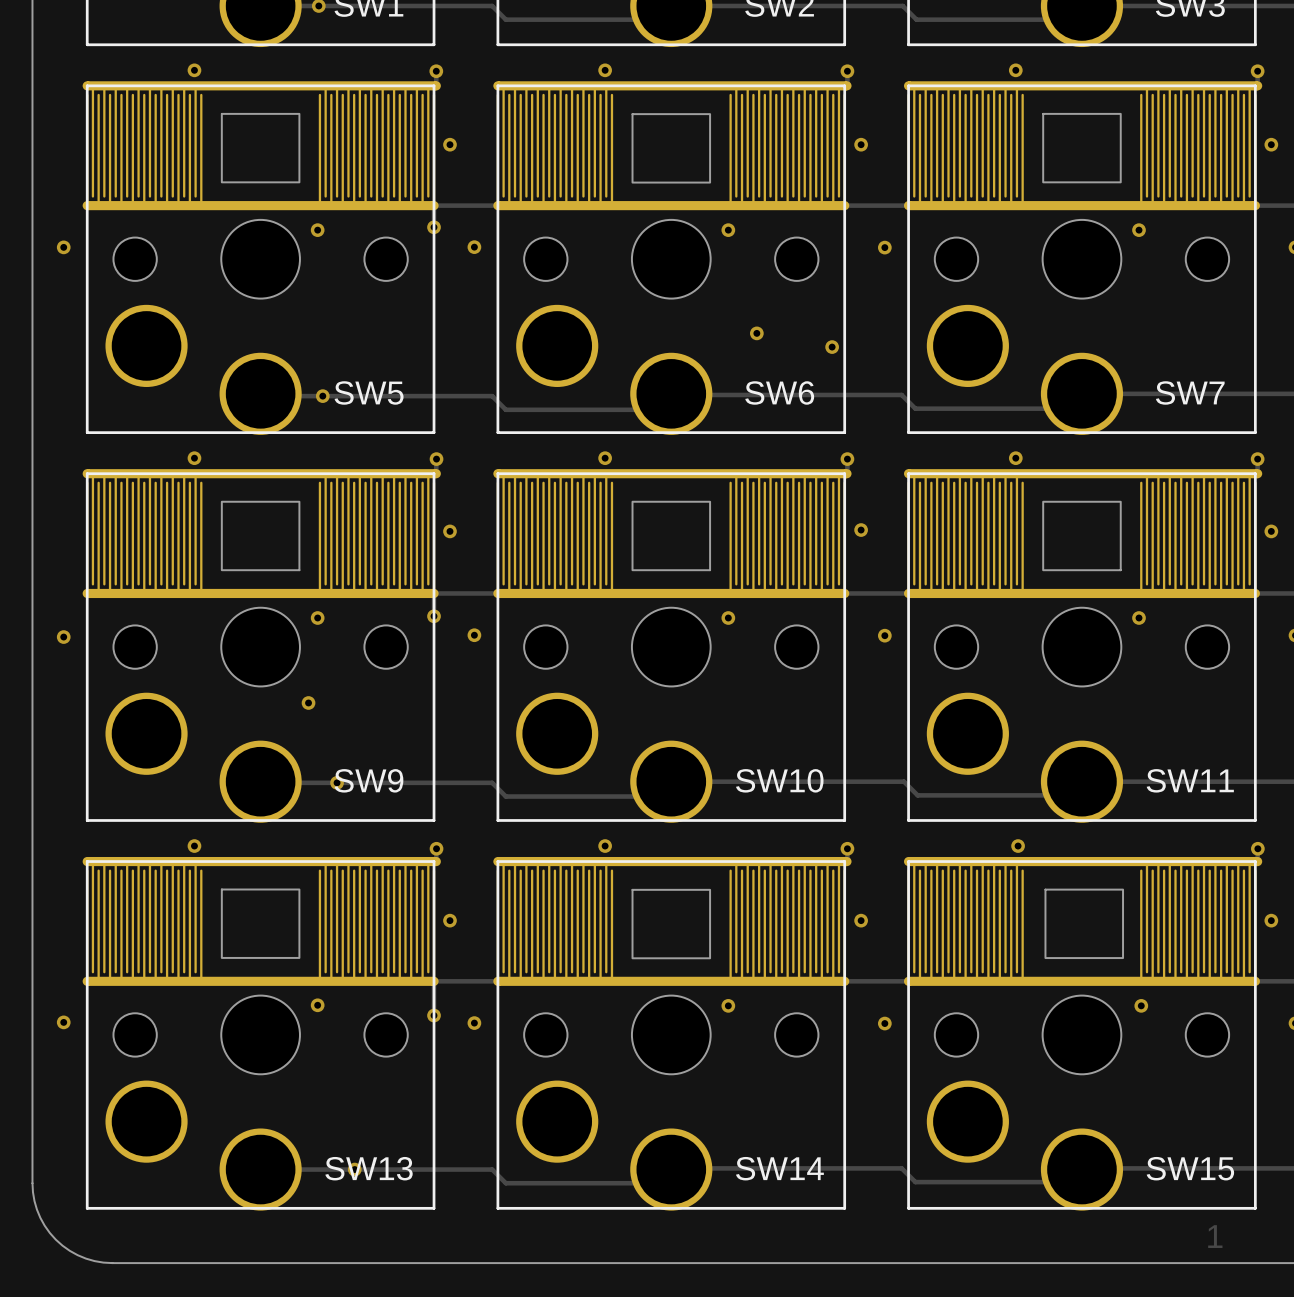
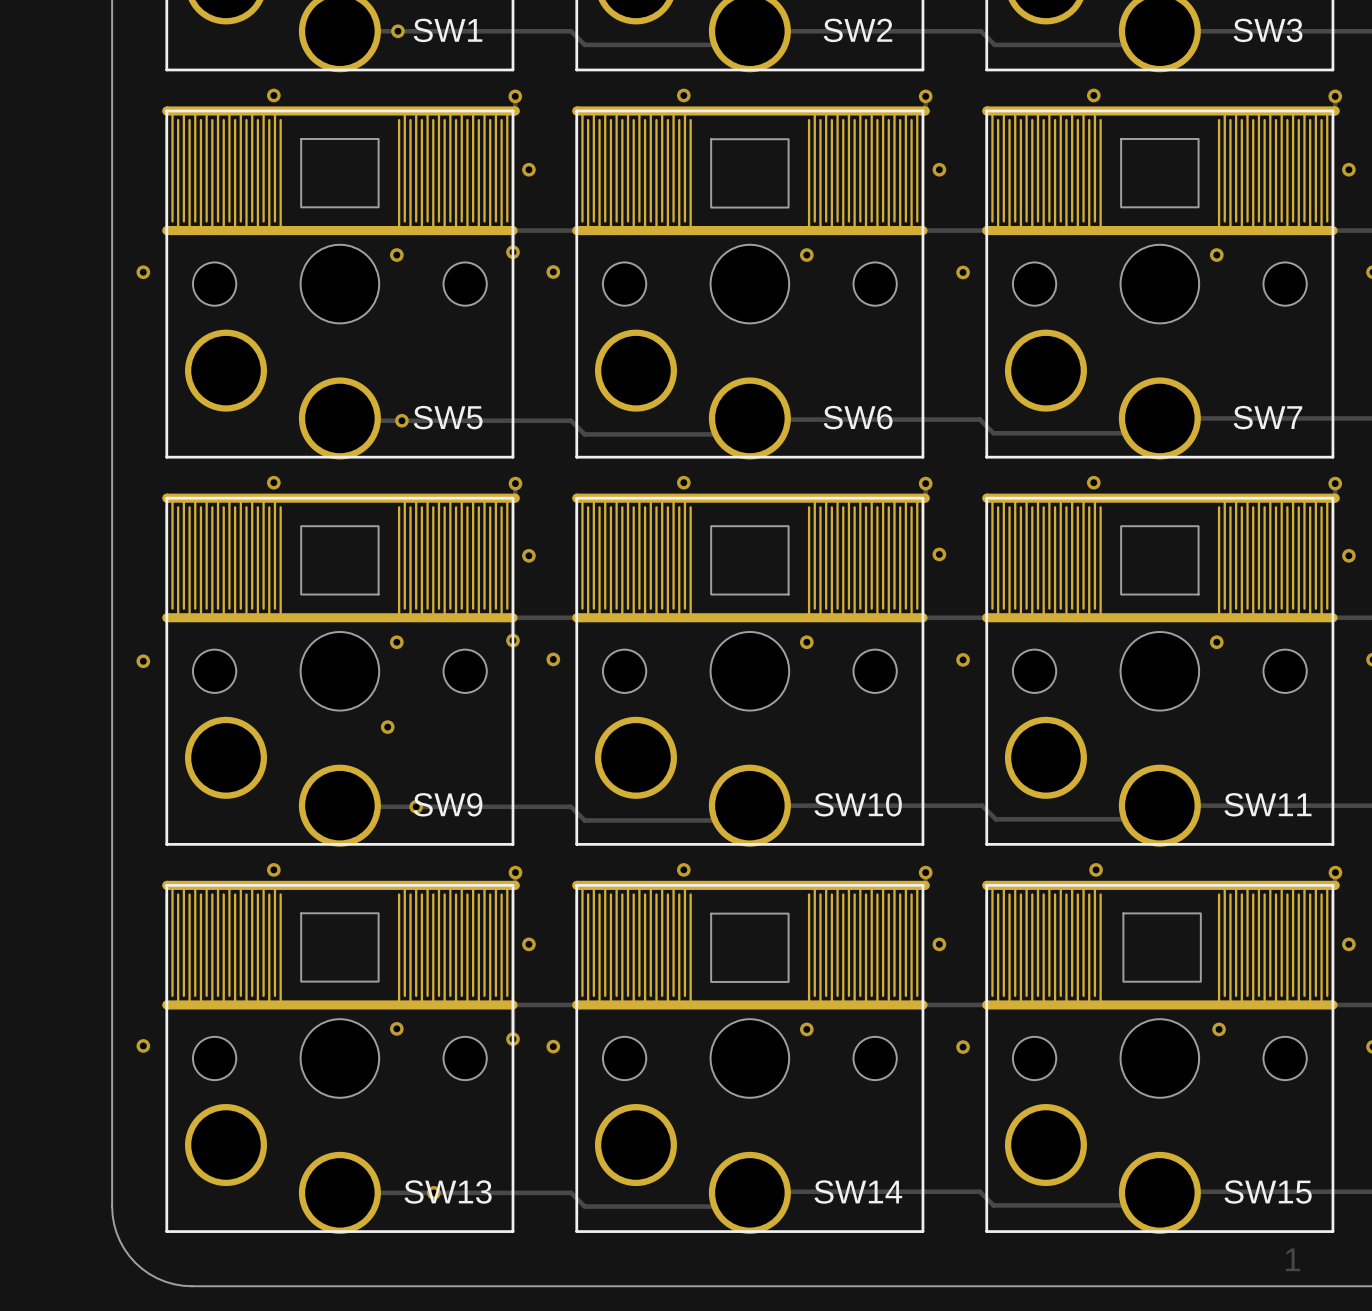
via: (756, 333) -> none
via: (832, 347) -> none

